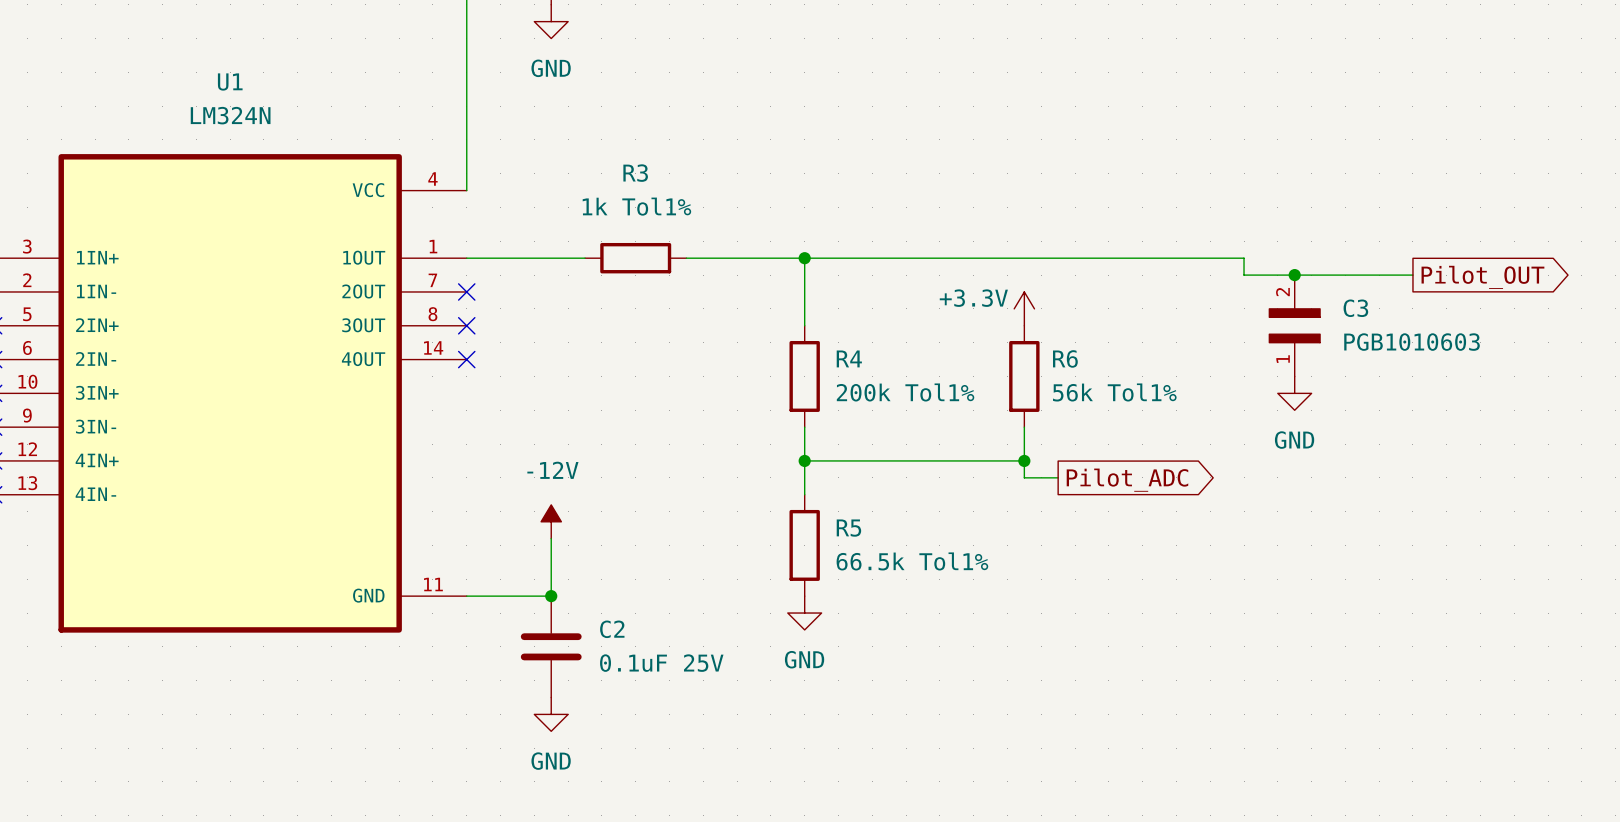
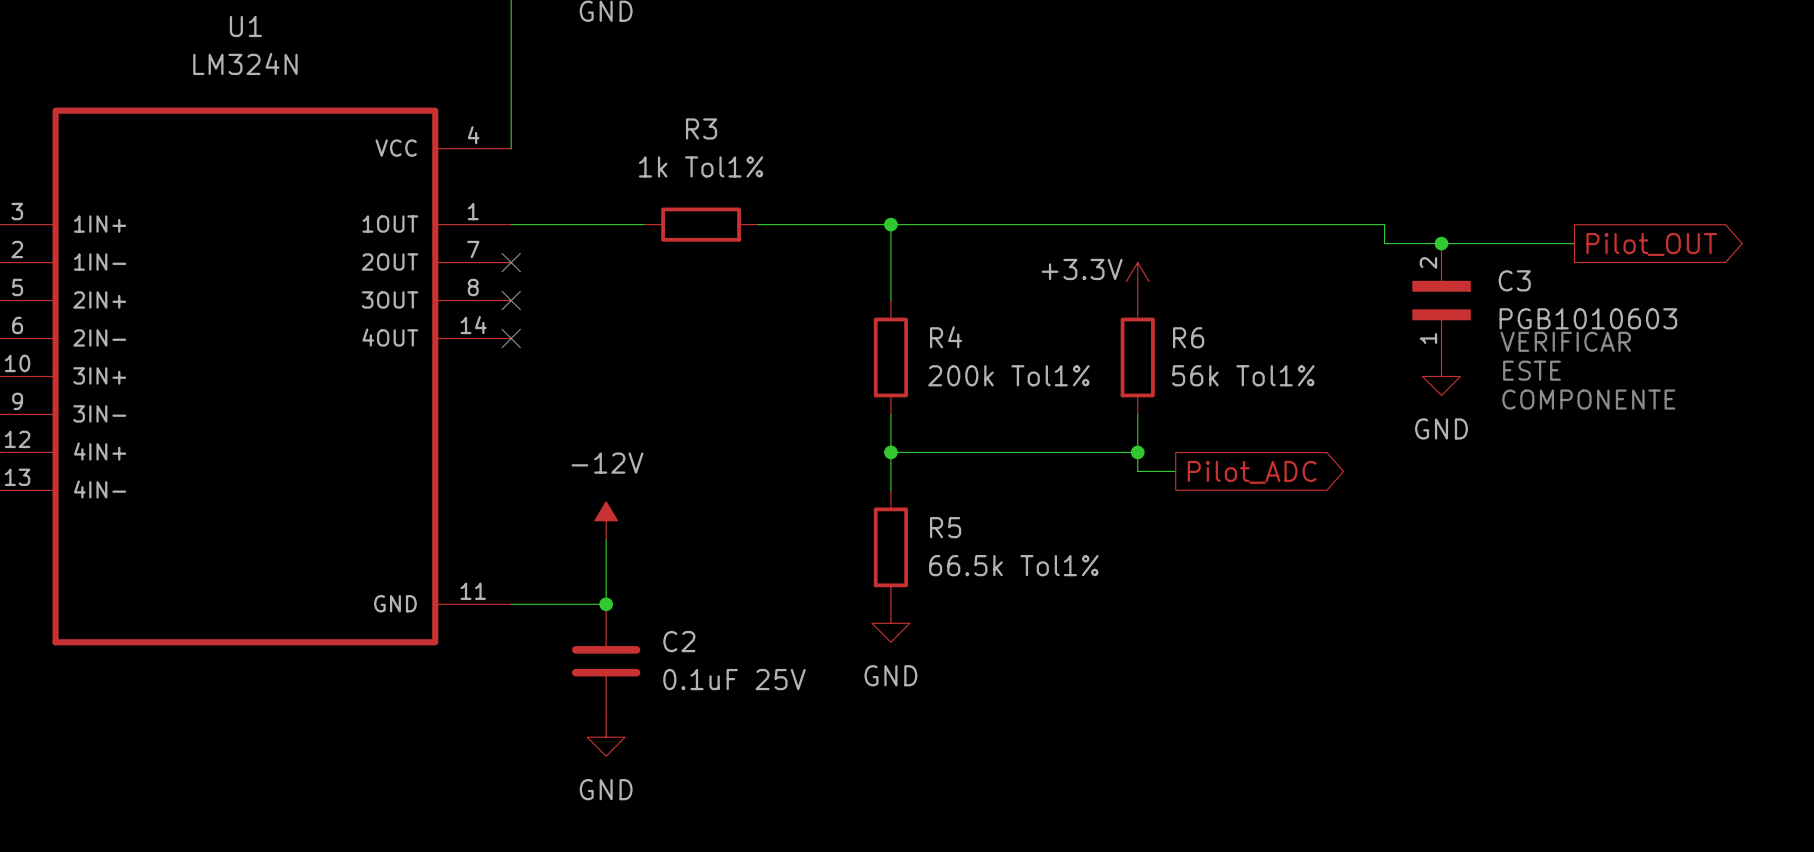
text: none -> VERIFICAR (1565, 341)
text: none -> ESTE (1532, 370)
text: none -> COMPONENTE (1588, 399)

